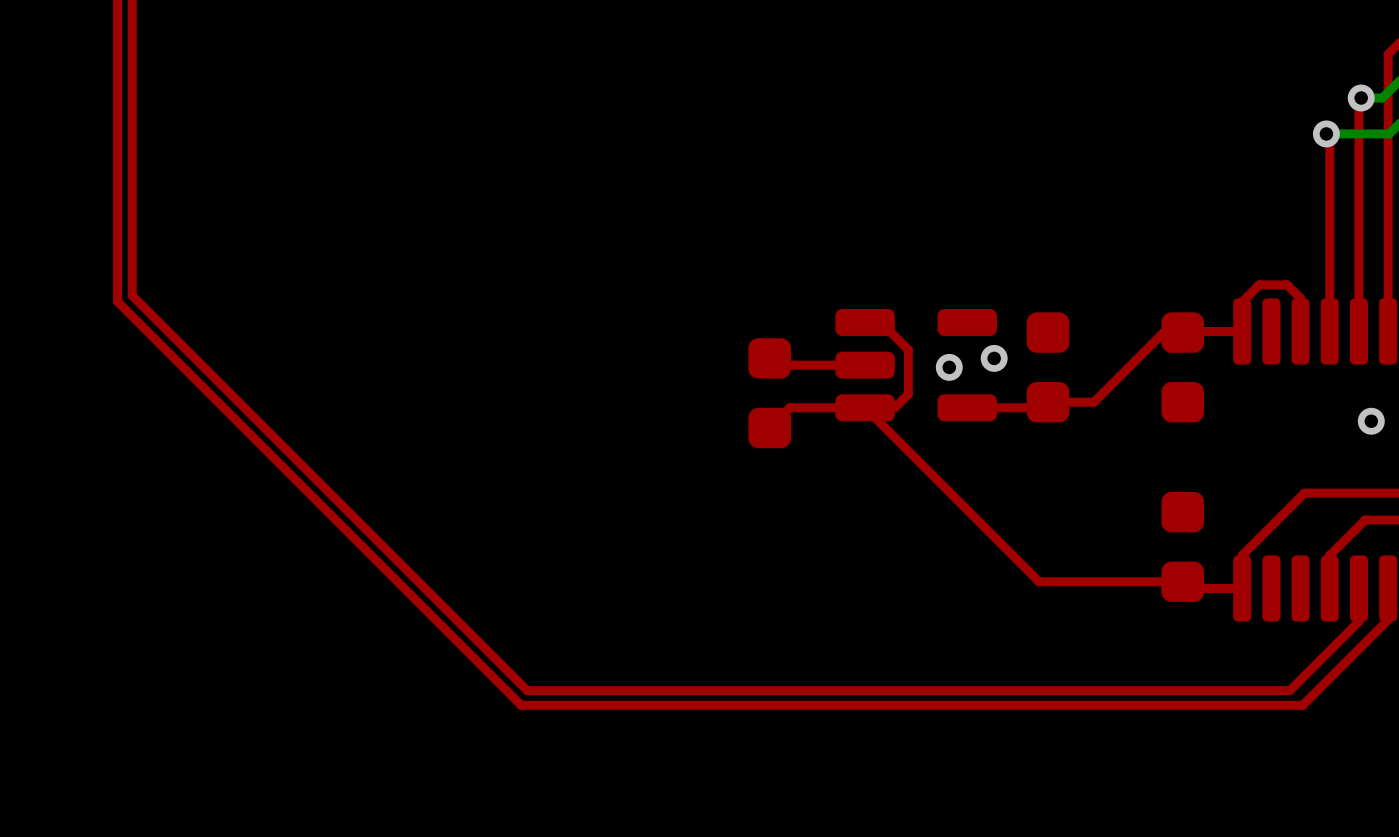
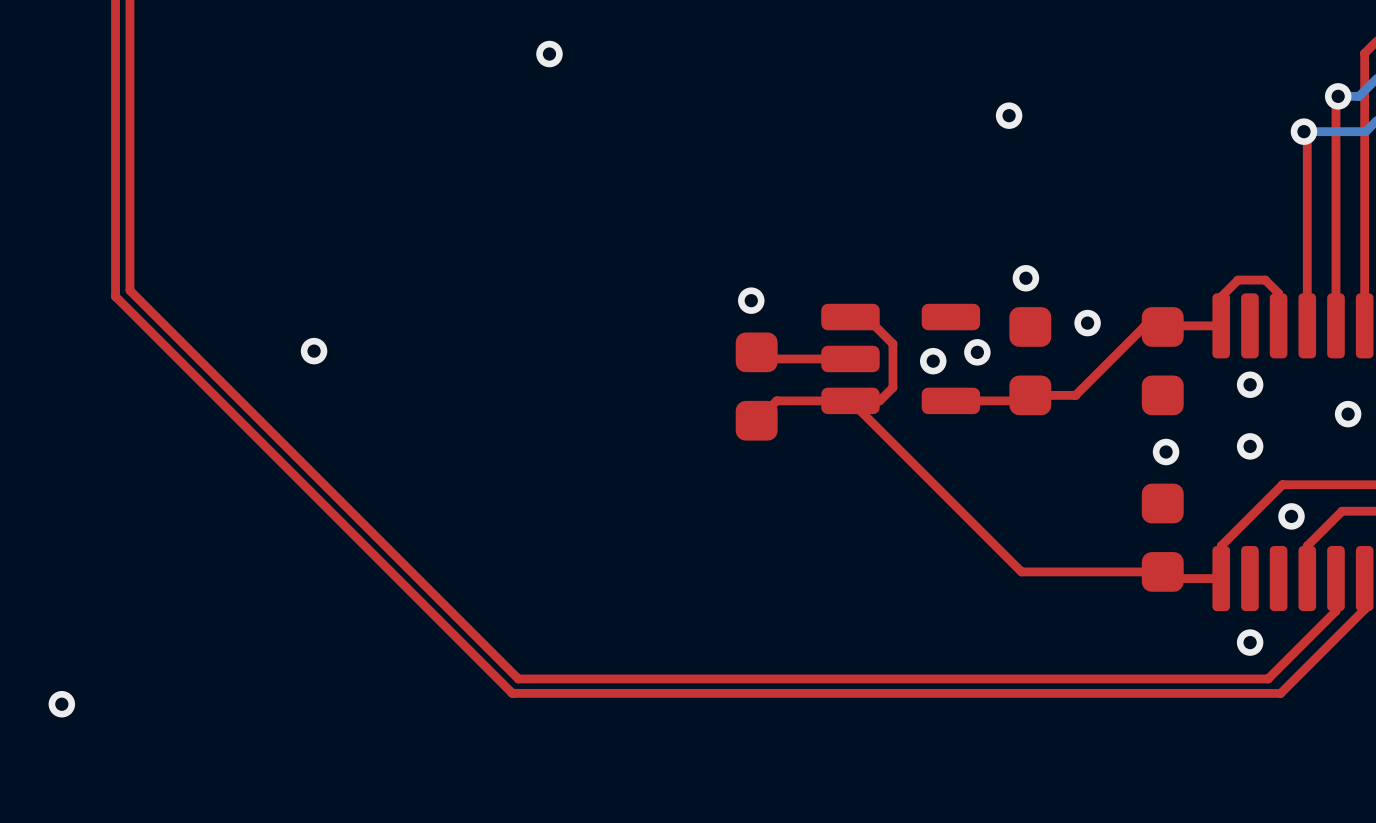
via: none -> (549, 54)
via: none -> (1009, 115)
via: none -> (1025, 278)
via: none -> (751, 300)
via: none -> (1087, 323)
via: none -> (314, 351)
via: none -> (1250, 384)
via: none -> (1250, 446)
via: none -> (1166, 452)
via: none -> (1291, 516)
via: none -> (1250, 642)
via: none -> (61, 704)

